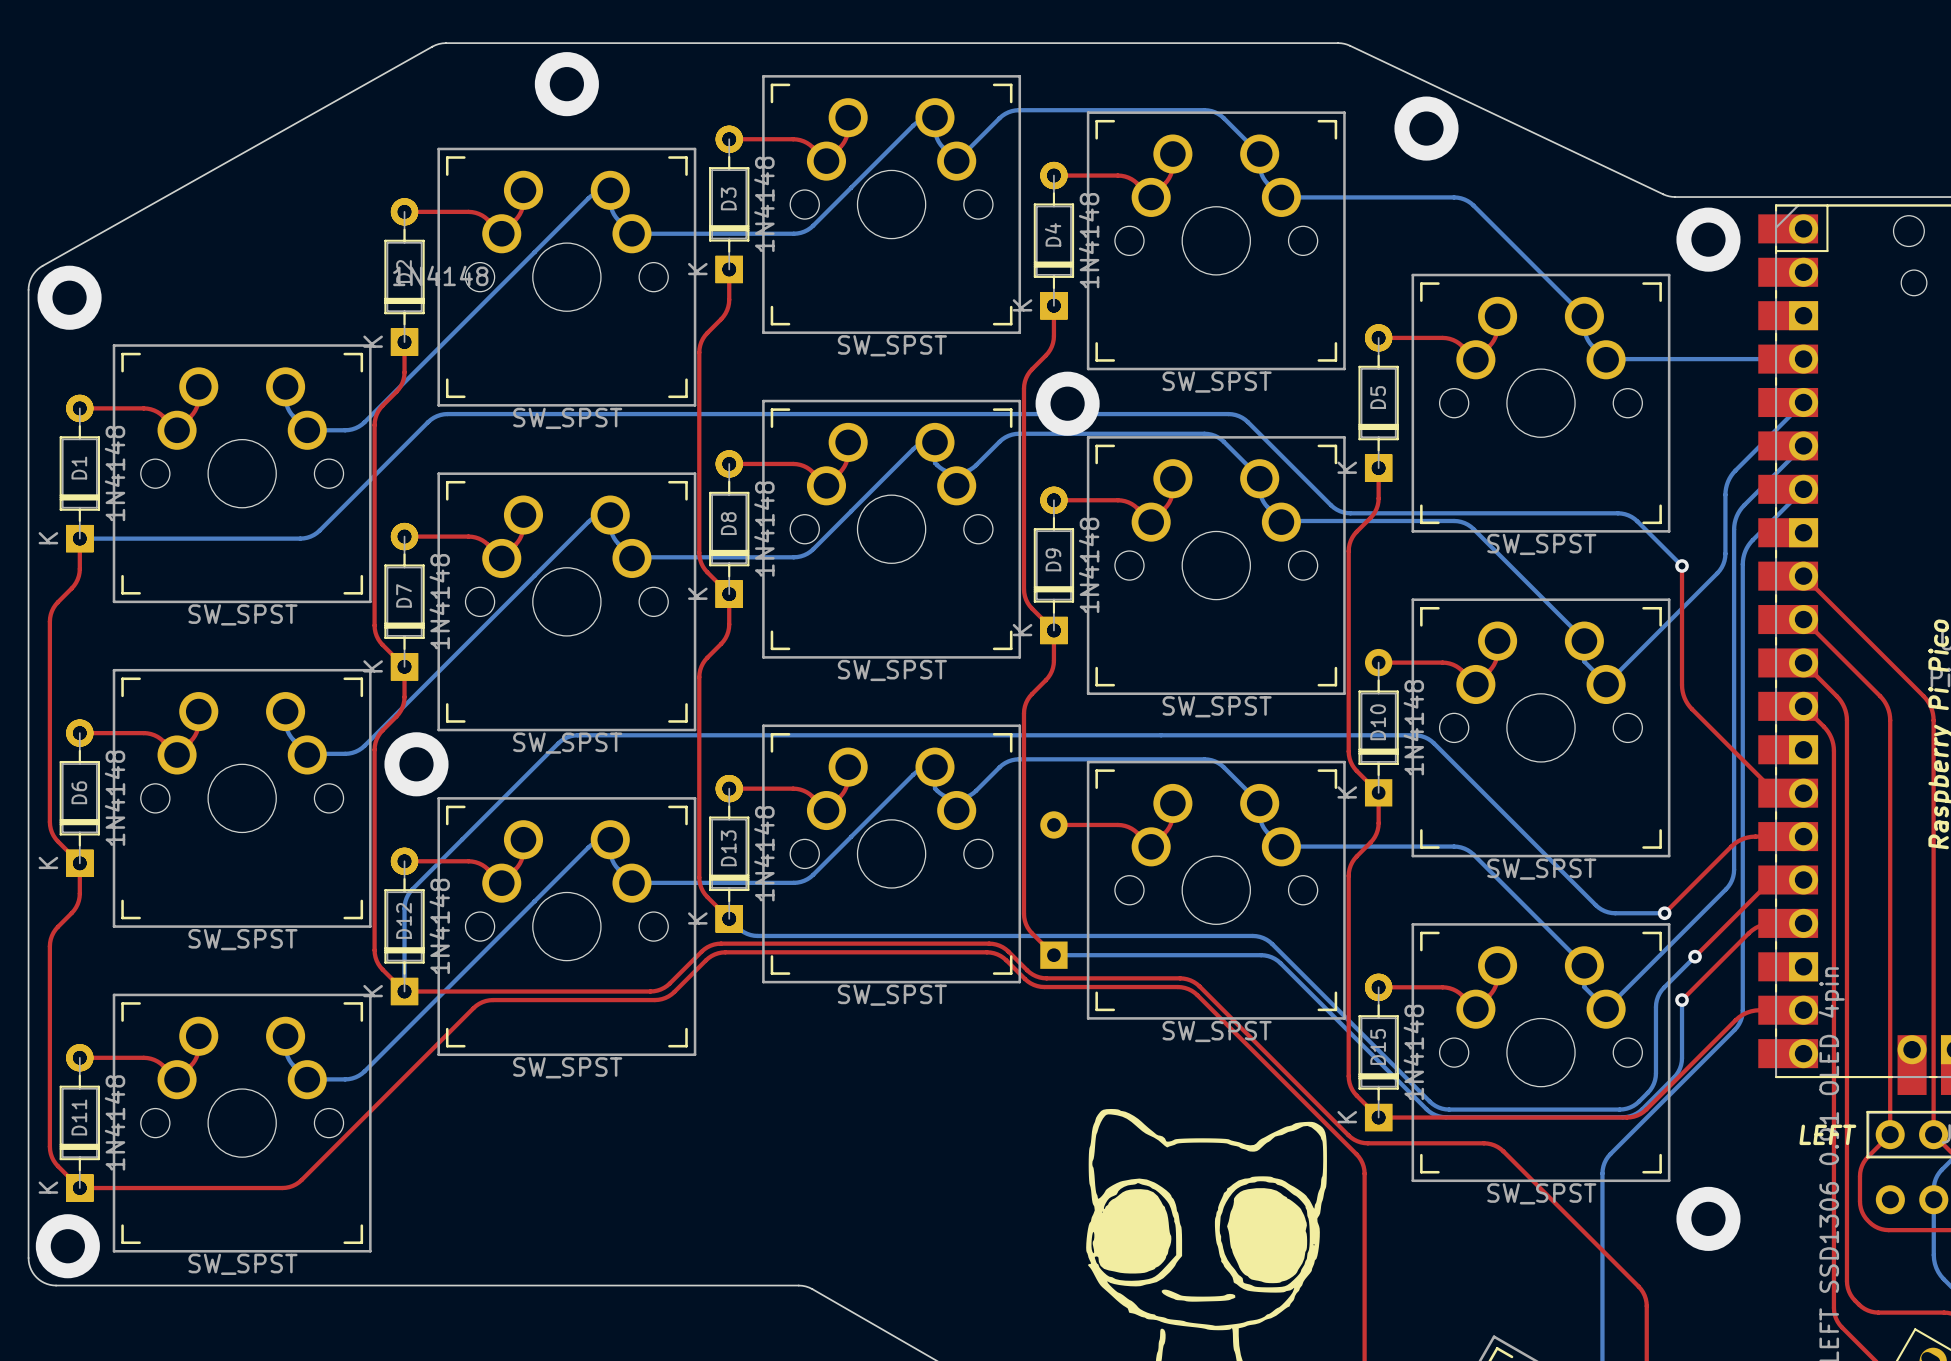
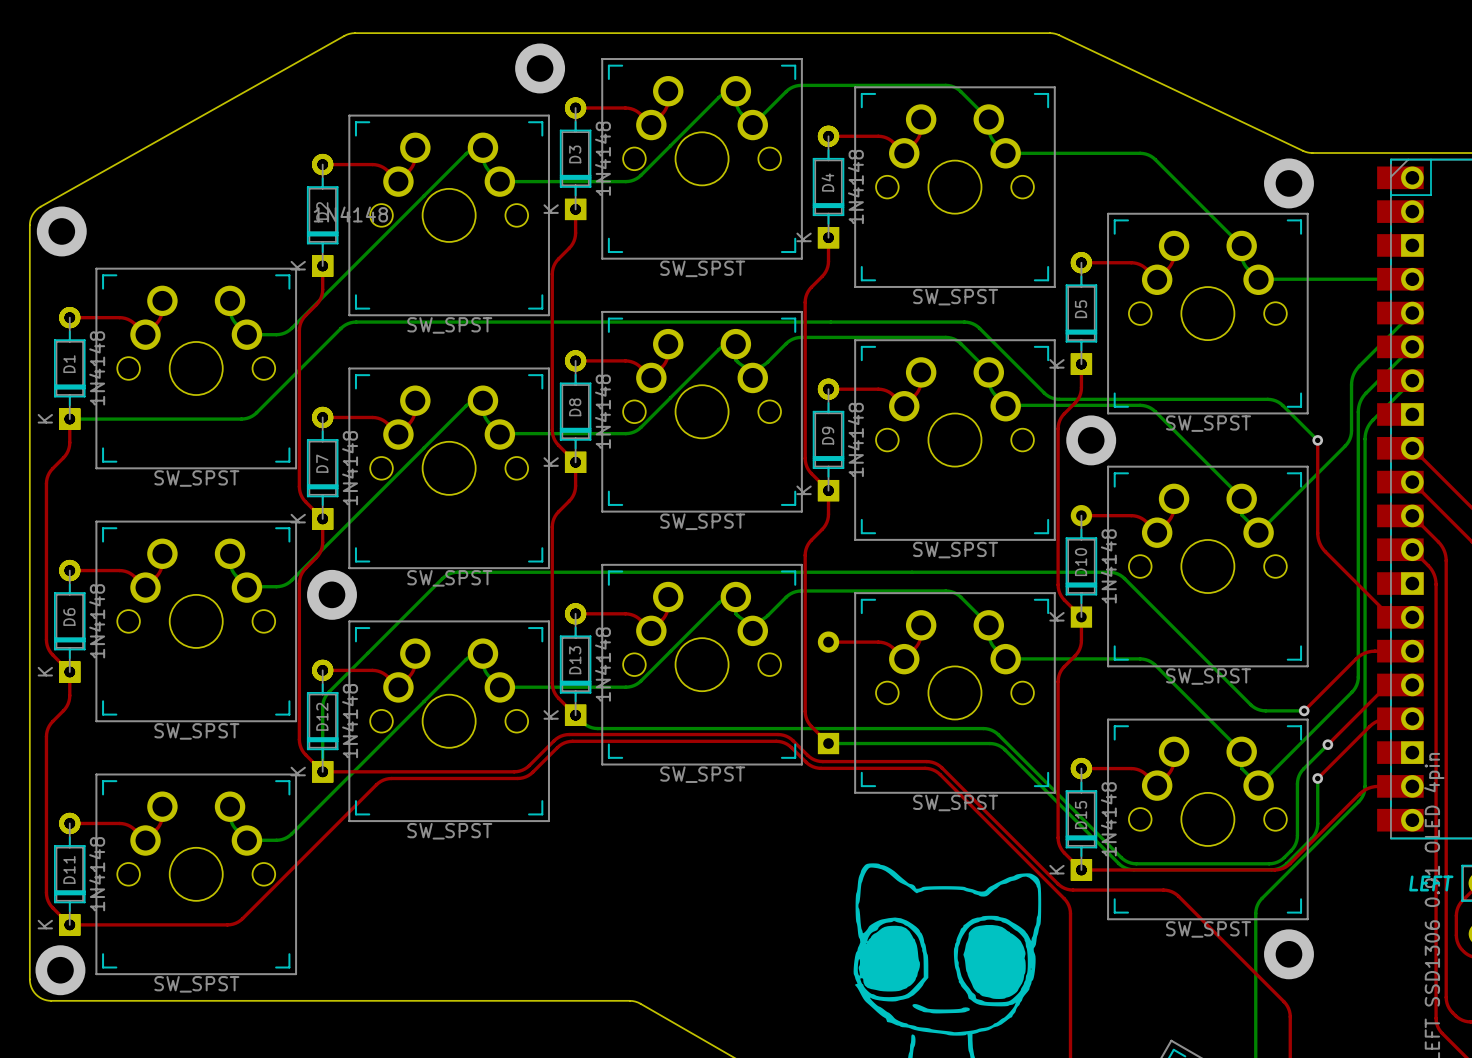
via: (566, 84) -> none
via: none -> (540, 68)
via: (1426, 128) -> none
via position: (1708, 239) -> (1288, 183)
via: (1067, 403) -> none
via: none -> (1091, 440)
via position: (1708, 1218) -> (1288, 954)

